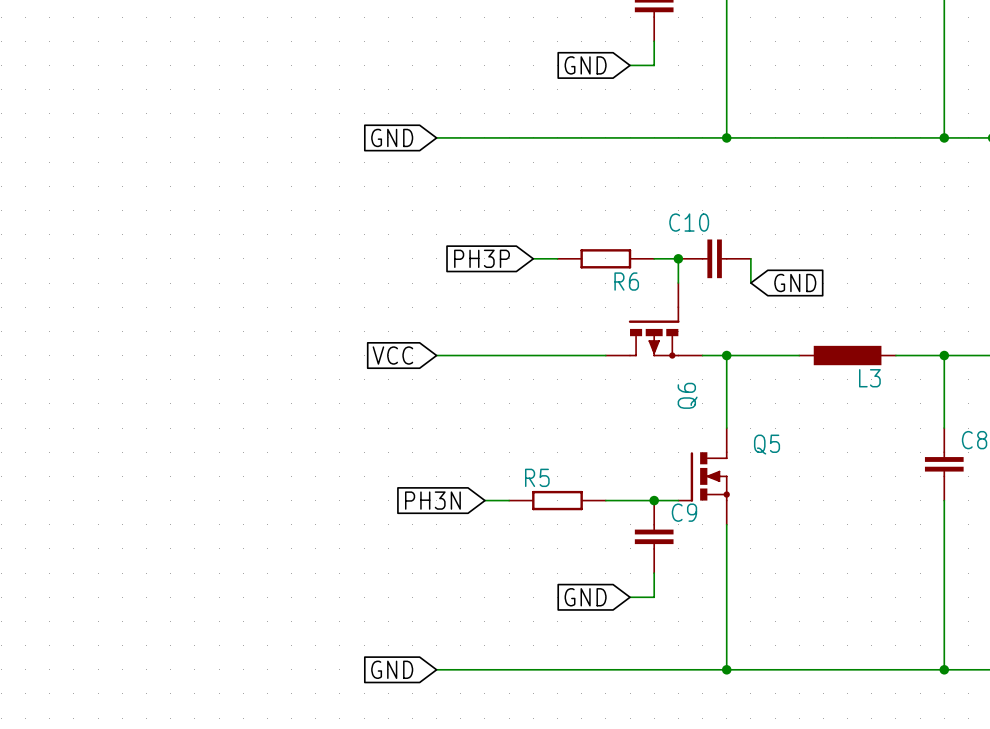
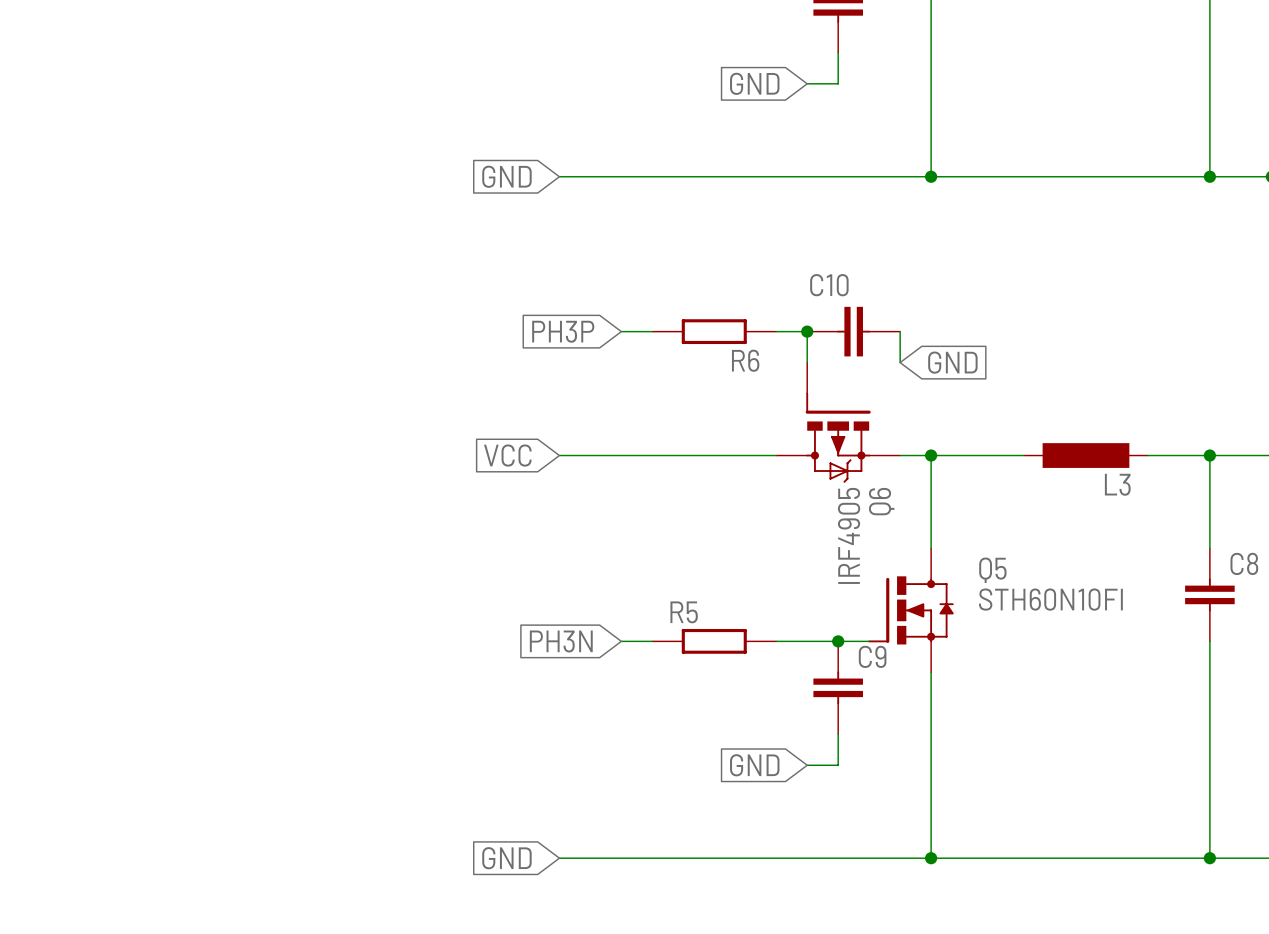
global label position: PH3P (482, 258) -> PH3P (563, 331)
wire: (533, 258) (557, 258) -> (621, 331) (652, 331)
R6 position: (605, 258) -> (714, 331)
wire: (654, 258) (678, 258) (678, 283) -> (776, 331) (807, 331) (807, 362)
junction position: (678, 258) -> (807, 331)
C10 position: (714, 258) -> (853, 331)
wire: (750, 258) (750, 283) -> (900, 331) (900, 362)
Q6 symbol: [605, 283, 703, 359] -> [776, 362, 901, 483]
global label position: GND (795, 283) -> GND (952, 362)
Q6 value: none -> IRF4905 (849, 535)
Q5 symbol: [677, 428, 730, 525] -> [868, 548, 954, 673]
Q5 value: none -> STH60N10FI (1050, 599)

